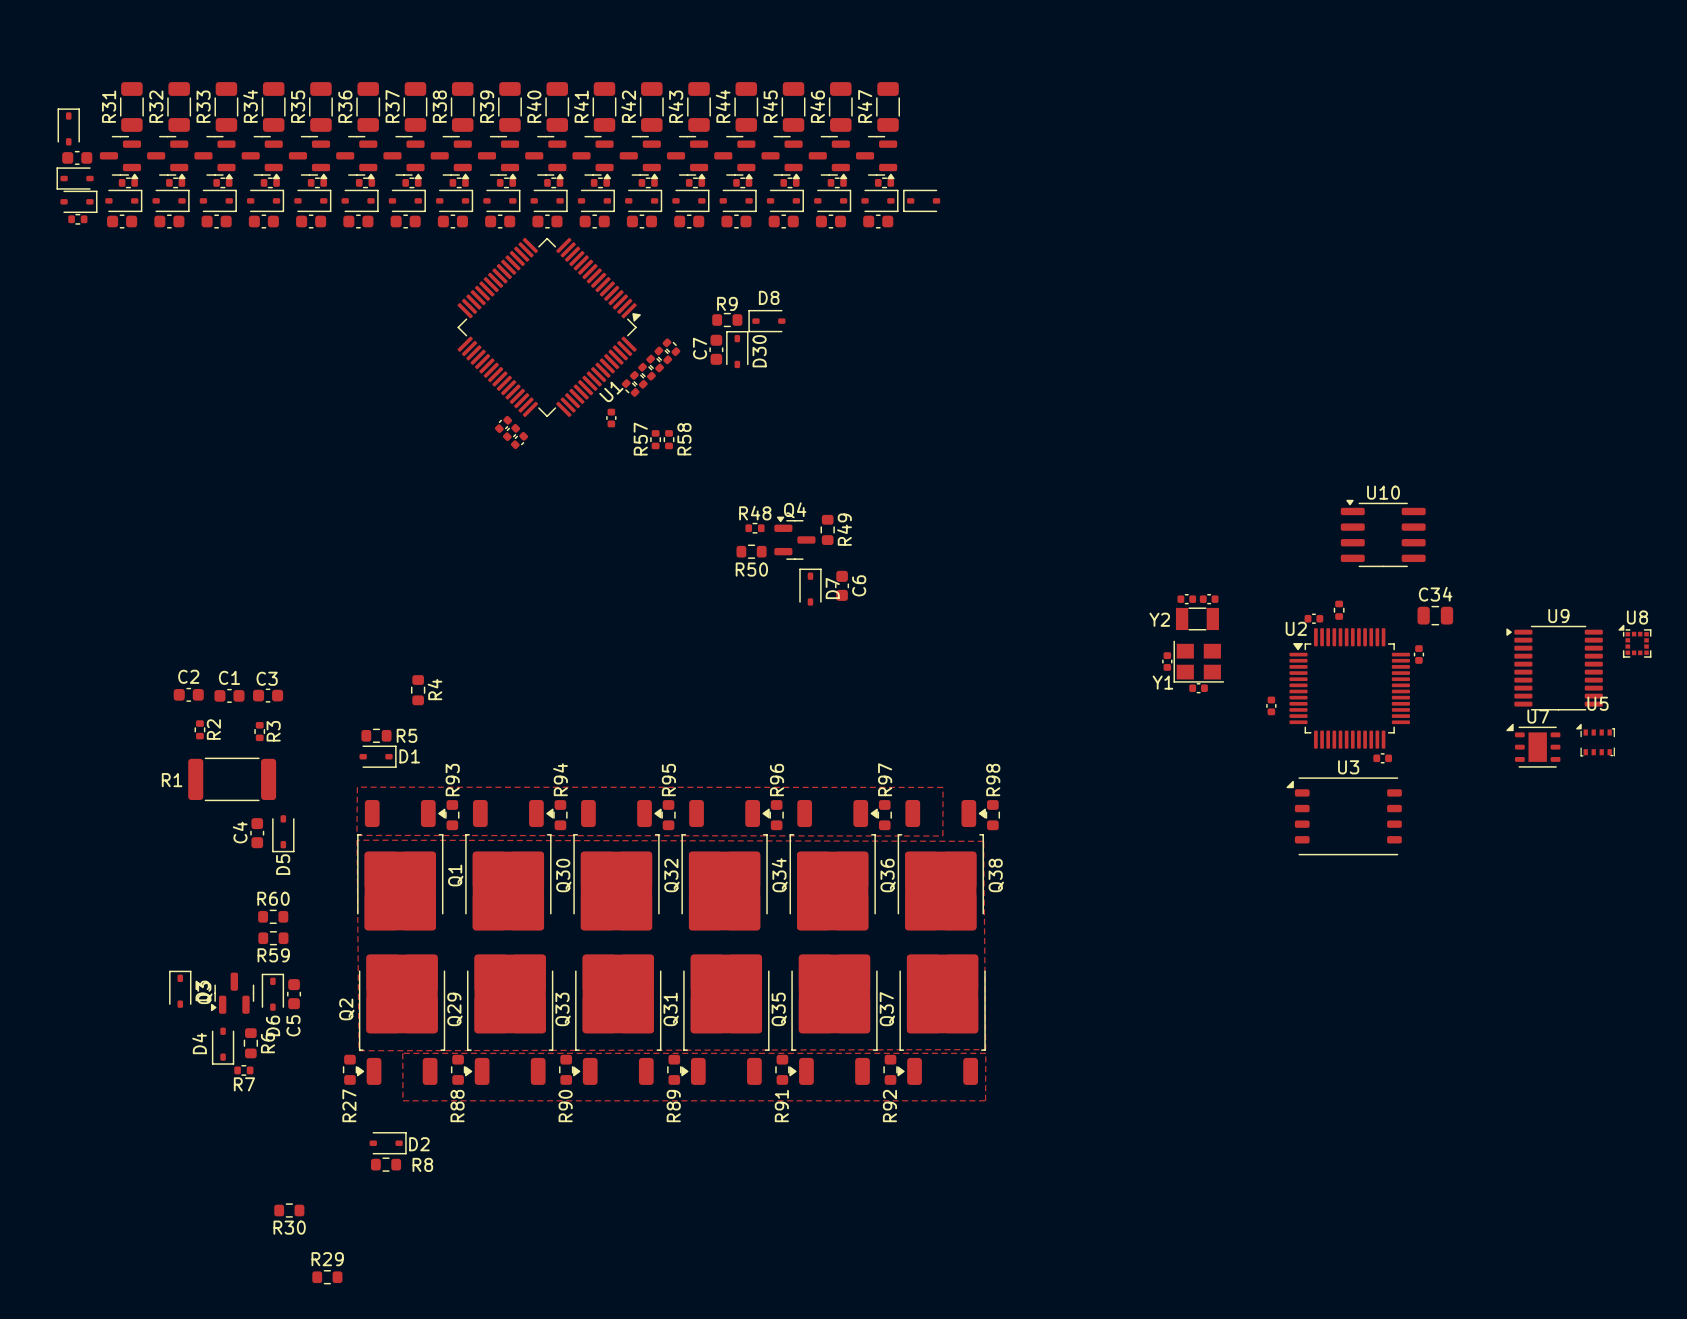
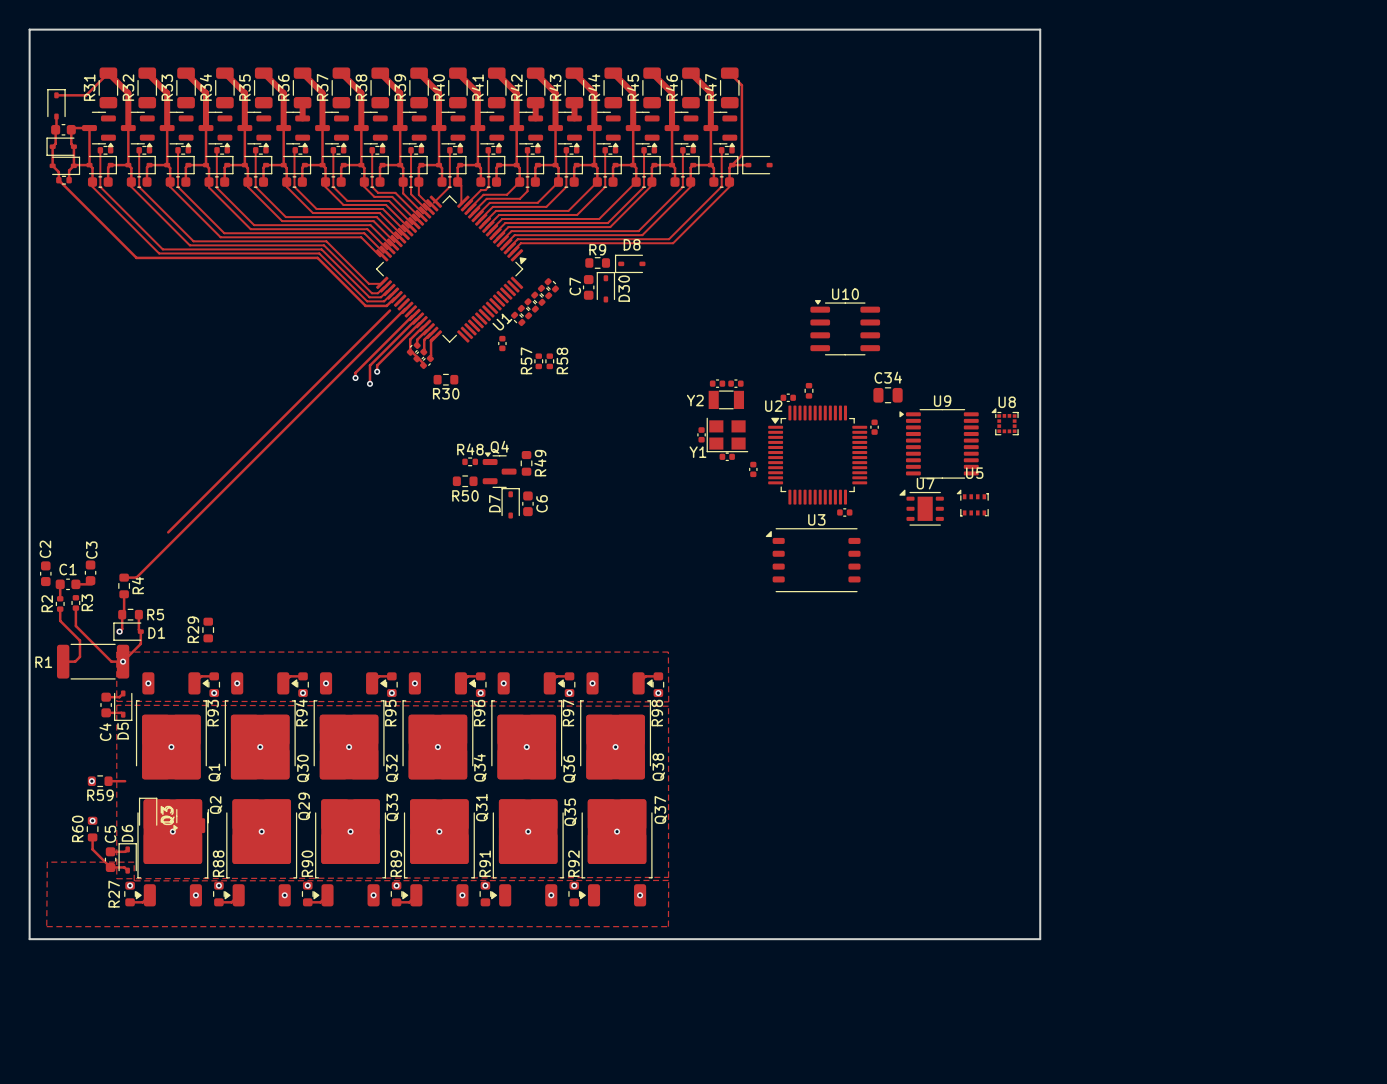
board edge: none -> (29, 29) (1040, 29) (1040, 939) (29, 939) (29, 29)
track: none -> (147, 73) (167, 93) (167, 165)
track: none -> (186, 73) (206, 93) (206, 165)
track: none -> (224, 73) (244, 93) (244, 165)
track: none -> (263, 73) (283, 93) (283, 165)
track: none -> (302, 73) (322, 93) (322, 165)
track: none -> (341, 73) (361, 93) (361, 165)
track: none -> (380, 73) (400, 93) (400, 165)
track: none -> (419, 73) (439, 93) (439, 165)
track: none -> (457, 73) (477, 93) (477, 165)
track: none -> (496, 73) (516, 93) (516, 165)
track: none -> (535, 73) (555, 93) (555, 165)
track: none -> (574, 73) (594, 93) (594, 165)
track: none -> (613, 73) (633, 93) (633, 165)
track: none -> (652, 73) (672, 93) (672, 165)
track: none -> (690, 73) (710, 93) (710, 165)
track: none -> (729, 73) (741, 85) (741, 155) (729, 167) (729, 186) (673, 243) (520, 243) (511, 252)
track: none -> (56, 95) (86, 95) (108, 73) (128, 93) (128, 165)
track: none -> (535, 102) (535, 118)
track: none -> (302, 102) (302, 118)
track: none -> (574, 102) (574, 118)
track: none -> (56, 116) (52, 165) (58, 172) (58, 180) (136, 257) (317, 257) (365, 305) (386, 305) (394, 298)
track: none -> (100, 150) (100, 186) (162, 249) (321, 249) (369, 297) (381, 297) (387, 290)
track: none -> (139, 150) (139, 186) (193, 241) (326, 241) (368, 283) (380, 283)
track: none -> (178, 150) (178, 186) (224, 233) (364, 233) (383, 252)
track: none -> (255, 150) (255, 186) (285, 217) (376, 217) (398, 238)
track: none -> (295, 150) (294, 186) (316, 209) (382, 209) (405, 231)
track: none -> (333, 150) (333, 186) (347, 200) (389, 200) (412, 224)
track: none -> (372, 150) (372, 186) (378, 192) (395, 192) (419, 217)
track: none -> (411, 150) (411, 194) (426, 209)
track: none -> (449, 150) (449, 186) (433, 202)
track: none -> (488, 150) (488, 186) (485, 190) (481, 190) (464, 206)
track: none -> (527, 150) (527, 191) (519, 198) (486, 198) (472, 213)
track: none -> (566, 150) (566, 186) (546, 206) (492, 206) (479, 220)
track: none -> (605, 150) (605, 186) (577, 214) (499, 214) (486, 227)
track: none -> (644, 150) (644, 186) (607, 223) (505, 223) (493, 234)
track: none -> (682, 150) (682, 186) (638, 231) (511, 231) (500, 242)
track: none -> (721, 150) (721, 186) (669, 239) (517, 239) (507, 249)
track: none -> (216, 150) (216, 187) (254, 225) (370, 225) (390, 245)
track: none -> (89, 165) (92, 168) (92, 186) (159, 253) (319, 253) (367, 301) (384, 301) (390, 294)
track: none -> (89, 165) (74, 165) (69, 170) (69, 180)
track: none -> (89, 165) (89, 128) (73, 128) (71, 129) (71, 144) (73, 146) (73, 165)
track: none -> (128, 165) (110, 165) (108, 167) (108, 182)
track: none -> (128, 165) (131, 168) (131, 186) (189, 245) (324, 245) (371, 293) (377, 293) (383, 287)
track: none -> (167, 165) (149, 165) (147, 167) (147, 182)
track: none -> (167, 165) (170, 168) (170, 186) (220, 237) (361, 237) (380, 256)
track: none -> (206, 165) (188, 165) (185, 167) (185, 182)
track: none -> (206, 165) (209, 168) (209, 187) (250, 229) (367, 229) (387, 249)
track: none -> (244, 165) (227, 165) (224, 167) (224, 182)
track: none -> (244, 165) (247, 168) (247, 186) (282, 221) (373, 221) (394, 242)
track: none -> (283, 165) (266, 165) (263, 167) (263, 182)
track: none -> (283, 165) (286, 168) (286, 186) (312, 213) (379, 213) (401, 234)
track: none -> (322, 165) (304, 165) (302, 167) (302, 182)
track: none -> (322, 165) (325, 168) (325, 186) (343, 204) (386, 204) (408, 227)
track: none -> (361, 165) (343, 165) (341, 167) (341, 182)
track: none -> (361, 165) (364, 168) (364, 186) (374, 196) (392, 196) (415, 220)
track: none -> (400, 165) (382, 165) (380, 167) (380, 182)
track: none -> (400, 165) (403, 168) (403, 193) (423, 213)
track: none -> (439, 165) (421, 165) (418, 167) (418, 194) (430, 206)
track: none -> (439, 165) (442, 168) (442, 182)
track: none -> (477, 165) (460, 165) (457, 167) (457, 182) (461, 185) (461, 202)
track: none -> (477, 165) (480, 168) (480, 182)
track: none -> (516, 165) (499, 165) (496, 167) (496, 182)
track: none -> (516, 165) (519, 168) (519, 182) (506, 194) (483, 194) (468, 209)
track: none -> (555, 165) (537, 165) (535, 167) (535, 182)
track: none -> (555, 165) (558, 168) (558, 182) (537, 202) (489, 202) (475, 217)
track: none -> (594, 165) (576, 165) (574, 167) (574, 182)
track: none -> (594, 165) (597, 168) (597, 182) (568, 210) (496, 210) (482, 224)
track: none -> (633, 165) (615, 165) (613, 167) (613, 182)
track: none -> (633, 165) (636, 168) (636, 182) (599, 219) (502, 219) (489, 231)
track: none -> (672, 165) (654, 165) (651, 167) (651, 182)
track: none -> (672, 165) (675, 168) (675, 182)
track: none -> (710, 165) (693, 165) (690, 167) (690, 186) (642, 235) (514, 235) (504, 245)
track: none -> (710, 165) (713, 168) (713, 182)
track: none -> (732, 165) (748, 165)
track: none -> (651, 185) (610, 227) (508, 227) (497, 238)
track: none -> (405, 308) (136, 577) (124, 577)
track: none -> (390, 310) (168, 532)
track: none -> (412, 316) (355, 372) (355, 378)
track: none -> (415, 319) (369, 365) (369, 383)
track: none -> (419, 323) (377, 365) (377, 371)
track: none -> (423, 326) (410, 339) (410, 350) (423, 363)
track: none -> (426, 330) (417, 339) (417, 343)
track: none -> (430, 333) (424, 339) (423, 349)
track: none -> (433, 337) (431, 340) (430, 356)
via: none -> (377, 371)
via: none -> (355, 378)
part: none -> (717, 383)
part: none -> (735, 383)
via: none -> (369, 383)
part: none -> (809, 390)
part: none -> (788, 397)
part: none -> (874, 427)
R48 position: (754, 528) -> (470, 461)
R49 position: (827, 529) -> (526, 463)
part: none -> (701, 434)
U10 position: (1383, 533) -> (845, 327)
Q4 position: (794, 538) -> (499, 470)
R50 position: (751, 551) -> (465, 481)
part: none -> (727, 456)
part: none -> (753, 469)
C6 position: (842, 585) -> (527, 503)
D7 position: (810, 587) -> (510, 503)
D7 name position: D7 (832, 588) -> D7 (494, 503)
part: (1186, 599) -> none
part: (1209, 599) -> none
part: (1339, 610) -> none
C34 position: (1435, 615) -> (888, 395)
Y2 position: (1197, 618) -> (726, 399)
part: (1313, 618) -> none
part: none -> (844, 512)
U8 position: (1634, 641) -> (1005, 421)
part: (1418, 654) -> none
part: (1167, 661) -> none
Y1 position: (1198, 661) -> (727, 434)
U9 position: (1554, 668) -> (939, 443)
part: (1198, 688) -> none
U2 position: (1349, 688) -> (817, 455)
R4 position: (418, 690) -> (124, 585)
C2 rotation: 0° (188, 694) -> 90° clockwise (45, 573)
C2 position: (188, 694) -> (45, 573)
C1 position: (229, 695) -> (68, 584)
C3 rotation: 0° (268, 695) -> 90° clockwise (90, 572)
C3 position: (268, 695) -> (90, 572)
part: (1271, 705) -> none
track: none -> (60, 584) (60, 598)
track: none -> (75, 584) (91, 584)
track: none -> (124, 594) (122, 629) (119, 631)
R2 position: (199, 729) -> (60, 603)
R2 name position: R2 (213, 729) -> R2 (47, 603)
R3 position: (259, 731) -> (75, 602)
R5 position: (376, 735) -> (130, 614)
track: none -> (75, 608) (75, 626) (111, 661) (123, 661) (140, 643) (138, 614)
U5 position: (1595, 740) -> (972, 503)
track: none -> (60, 609) (60, 620) (79, 640) (79, 656) (75, 661) (63, 661)
U7 position: (1533, 745) -> (921, 507)
D1 rotation: 0° (378, 756) -> 180° (128, 631)
D1 position: (378, 756) -> (128, 631)
part: (1382, 758) -> none
via: none -> (119, 631)
R1 position: (232, 779) -> (93, 661)
R94 name position: R94 (560, 779) -> R94 (301, 712)
R97 name position: R97 (885, 779) -> R97 (568, 712)
R93 name position: R93 (452, 780) -> R93 (213, 713)
R95 name position: R95 (668, 780) -> R95 (390, 713)
R96 name position: R96 (777, 780) -> R96 (479, 713)
R98 name position: R98 (993, 780) -> R98 (657, 713)
zone outline: (357, 787) (356, 835) (942, 836) (943, 787) (357, 787) -> none
zone outline: none -> (116, 652) (116, 701) (668, 701) (668, 652) (116, 652)
via: none -> (123, 661)
R93 position: (452, 815) -> (214, 684)
R94 position: (560, 815) -> (303, 684)
R95 position: (668, 815) -> (391, 684)
R96 position: (776, 815) -> (480, 684)
R97 position: (884, 815) -> (569, 684)
R98 position: (992, 815) -> (658, 684)
U3 position: (1344, 816) -> (813, 560)
track: none -> (214, 676) (201, 676) (194, 683)
track: none -> (303, 676) (290, 676) (283, 683)
track: none -> (391, 676) (379, 676) (372, 683)
track: none -> (480, 676) (467, 676) (460, 683)
track: none -> (569, 676) (556, 676) (549, 683)
track: none -> (658, 676) (645, 676) (638, 683)
via: none -> (148, 683)
via: none -> (237, 683)
via: none -> (326, 683)
via: none -> (414, 683)
via: none -> (503, 683)
via: none -> (592, 683)
C4 name position: C4 (240, 832) -> C4 (105, 732)
C4 position: (257, 833) -> (106, 705)
D5 position: (283, 833) -> (123, 705)
zone outline: (357, 840) (983, 841) (985, 1049) (358, 1050) (357, 840) -> none
track: none -> (123, 693) (119, 697) (106, 697)
via: none -> (214, 693)
via: none -> (303, 693)
via: none -> (391, 693)
via: none -> (480, 693)
via: none -> (569, 693)
via: none -> (658, 693)
zone outline: none -> (116, 705) (668, 706) (668, 877) (116, 878) (116, 705)
Q1 position: (401, 865) -> (172, 725)
Q30 position: (509, 865) -> (261, 725)
Q32 position: (617, 865) -> (349, 725)
Q34 position: (725, 865) -> (438, 725)
Q36 position: (833, 865) -> (527, 725)
Q38 position: (941, 865) -> (616, 725)
track: none -> (106, 712) (121, 712) (123, 714)
Q1 name position: Q1 (455, 875) -> Q1 (214, 772)
Q30 name position: Q30 (563, 875) -> Q30 (303, 768)
Q32 name position: Q32 (671, 875) -> Q32 (392, 768)
Q34 name position: Q34 (779, 875) -> Q34 (480, 767)
Q36 name position: Q36 (888, 875) -> Q36 (569, 768)
Q38 name position: Q38 (996, 875) -> Q38 (658, 767)
R60 name position: R60 (273, 898) -> R60 (77, 828)
via: none -> (171, 747)
via: none -> (260, 747)
via: none -> (349, 747)
via: none -> (437, 747)
via: none -> (526, 747)
via: none -> (615, 747)
R60 rotation: 0° (273, 916) -> 90° clockwise (92, 829)
R60 position: (273, 916) -> (92, 829)
R59 position: (273, 938) -> (100, 781)
via: none -> (91, 781)
track: none -> (108, 781) (125, 781)
D6 position: (272, 992) -> (127, 858)
C5 position: (294, 994) -> (110, 859)
via: none -> (92, 820)
Q2 name position: Q2 (346, 1009) -> Q2 (216, 805)
Q29 name position: Q29 (454, 1009) -> Q29 (304, 806)
Q33 name position: Q33 (563, 1009) -> Q33 (392, 807)
Q31 name position: Q31 (671, 1009) -> Q31 (482, 807)
Q35 name position: Q35 (779, 1009) -> Q35 (570, 812)
Q37 name position: Q37 (887, 1009) -> Q37 (660, 809)
via: none -> (172, 831)
via: none -> (261, 831)
via: none -> (350, 831)
via: none -> (439, 831)
via: none -> (528, 831)
via: none -> (617, 831)
track: none -> (92, 837) (92, 849) (110, 867) (124, 867) (127, 870)
Q2 position: (401, 1019) -> (172, 852)
Q29 position: (509, 1019) -> (260, 852)
Q33 position: (617, 1019) -> (349, 852)
Q31 position: (725, 1019) -> (438, 852)
Q35 position: (833, 1019) -> (527, 852)
Q37 position: (941, 1019) -> (616, 852)
D6 name position: D6 (273, 1025) -> D6 (127, 833)
C5 name position: C5 (293, 1025) -> C5 (110, 834)
track: none -> (127, 849) (125, 851) (110, 851)
R6: (250, 1043) -> none
D4: (223, 1046) -> none
zone outline: none -> (47, 862) (134, 862) (134, 880) (668, 880) (668, 926) (46, 926) (47, 862)
zone outline: (402, 1053) (403, 1100) (985, 1100) (985, 1053) (402, 1053) -> none
R27 position: (349, 1069) -> (130, 893)
R88 position: (458, 1069) -> (218, 893)
R90 position: (566, 1069) -> (307, 893)
R89 position: (674, 1069) -> (396, 893)
R91 position: (782, 1069) -> (485, 893)
R92 position: (890, 1069) -> (574, 893)
R7: (243, 1070) -> none
via: none -> (130, 885)
via: none -> (218, 885)
via: none -> (307, 885)
via: none -> (396, 885)
via: none -> (485, 885)
via: none -> (574, 885)
track: none -> (149, 895) (142, 902) (130, 902)
via: none -> (195, 895)
track: none -> (238, 895) (231, 902) (218, 902)
via: none -> (284, 895)
track: none -> (327, 895) (320, 902) (307, 902)
via: none -> (373, 895)
track: none -> (416, 895) (409, 902) (396, 902)
via: none -> (462, 895)
via: none -> (551, 895)
via: none -> (640, 895)
R27 name position: R27 (349, 1105) -> R27 (114, 894)
R88 name position: R88 (457, 1106) -> R88 (218, 863)
R90 name position: R90 (565, 1106) -> R90 (307, 863)
R89 name position: R89 (673, 1106) -> R89 (396, 863)
R91 name position: R91 (781, 1106) -> R91 (485, 863)
R92 name position: R92 (889, 1106) -> R92 (573, 863)
D2: (388, 1143) -> none
R8: (386, 1164) -> none
R30 position: (289, 1210) -> (445, 379)
R29 name position: R29 (327, 1259) -> R29 (193, 629)
R29 rotation: 0° (327, 1277) -> 90° clockwise (208, 630)
R29 position: (327, 1277) -> (208, 630)

